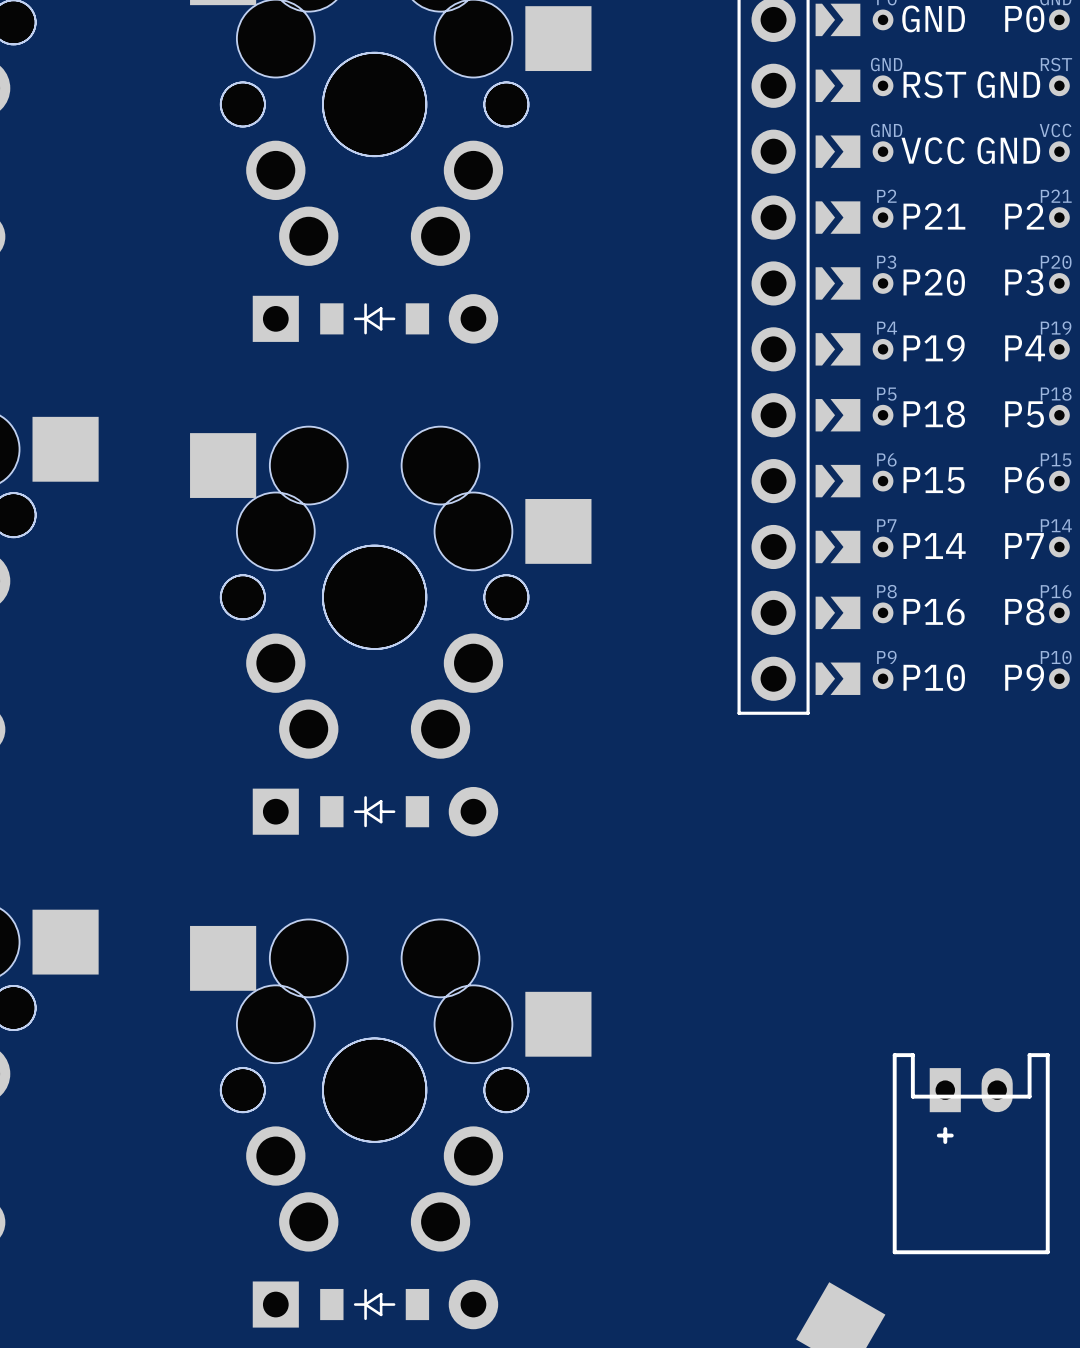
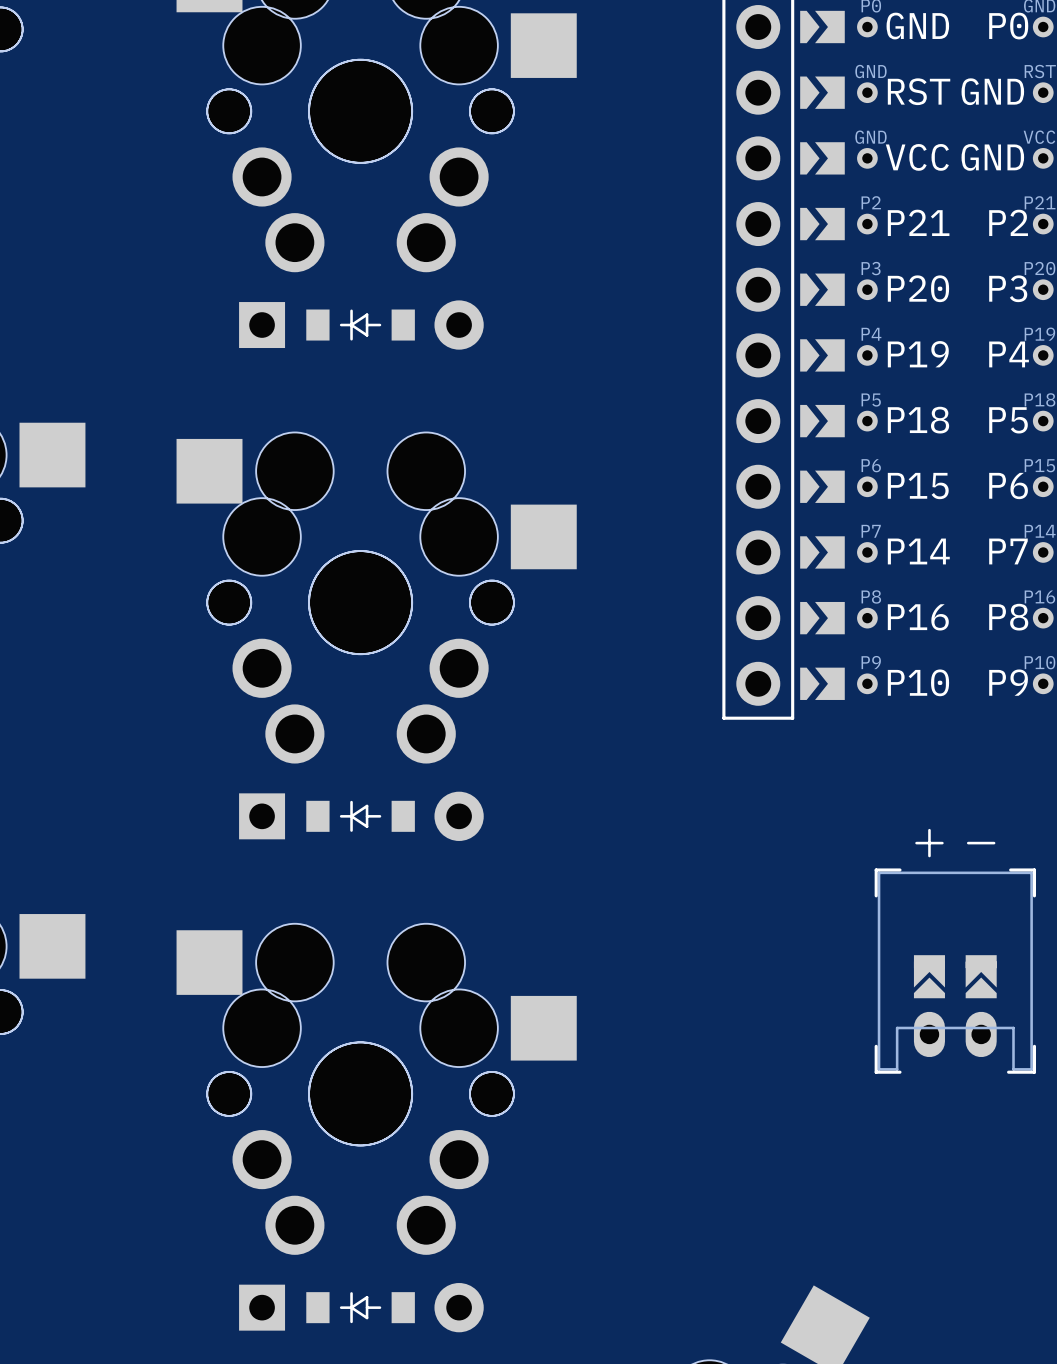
part: none -> (955, 951)
part: (971, 1153) -> none

